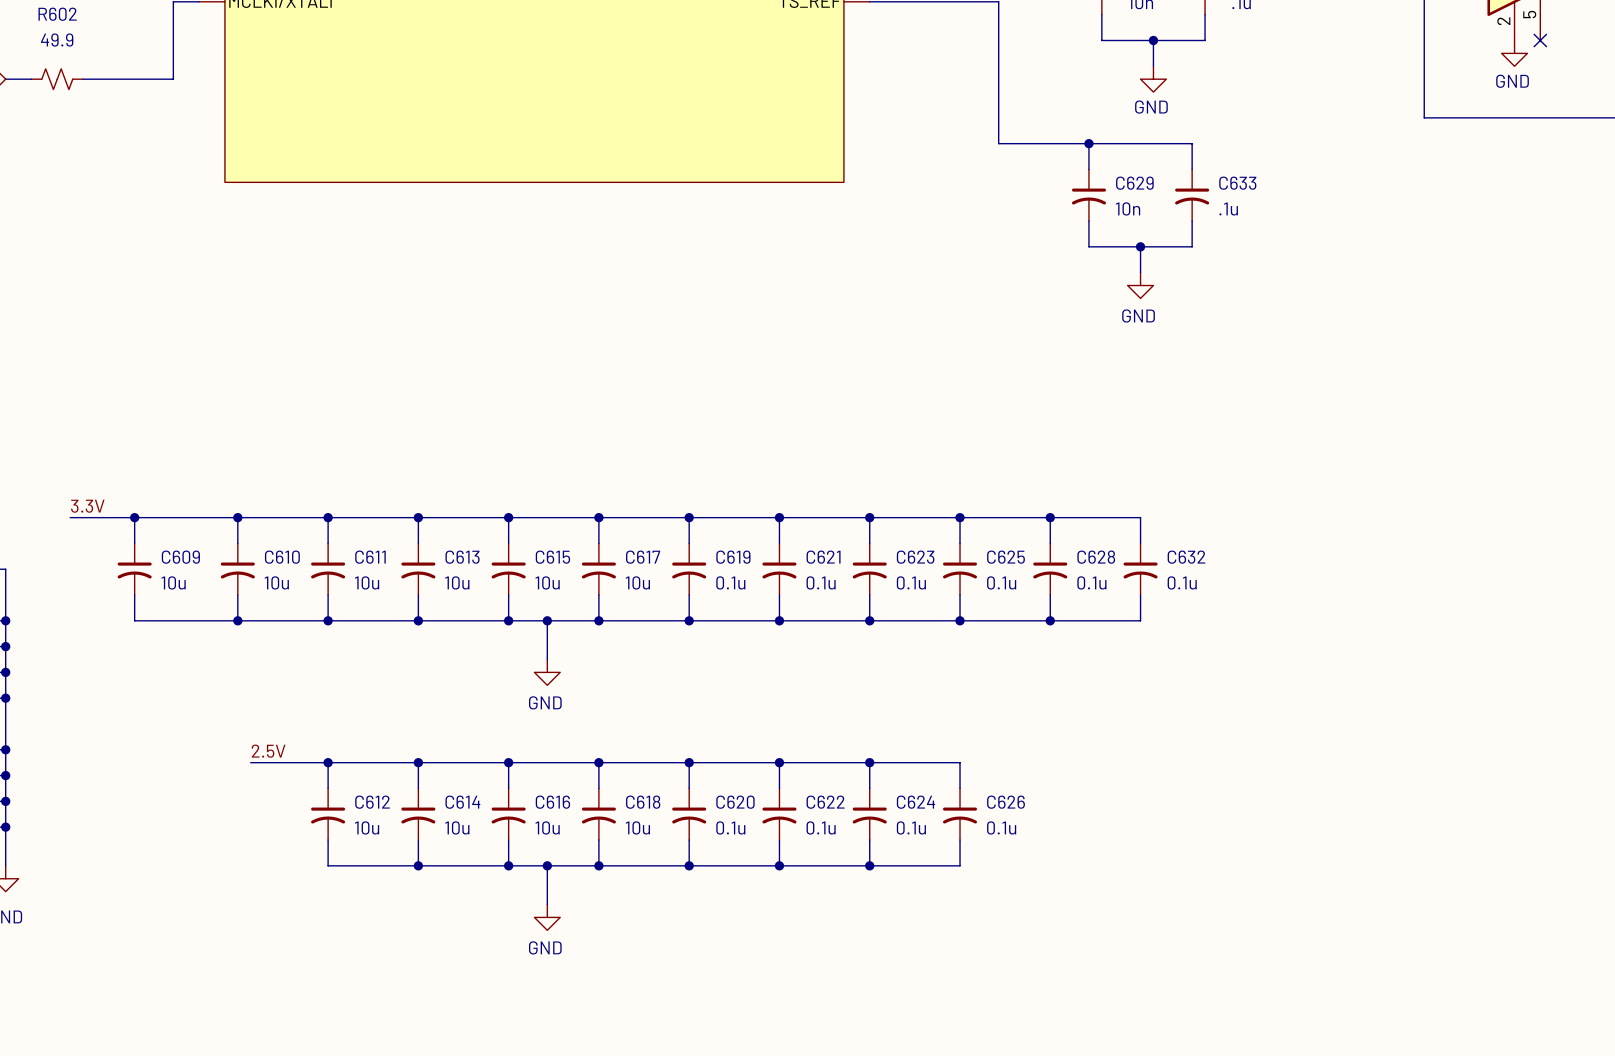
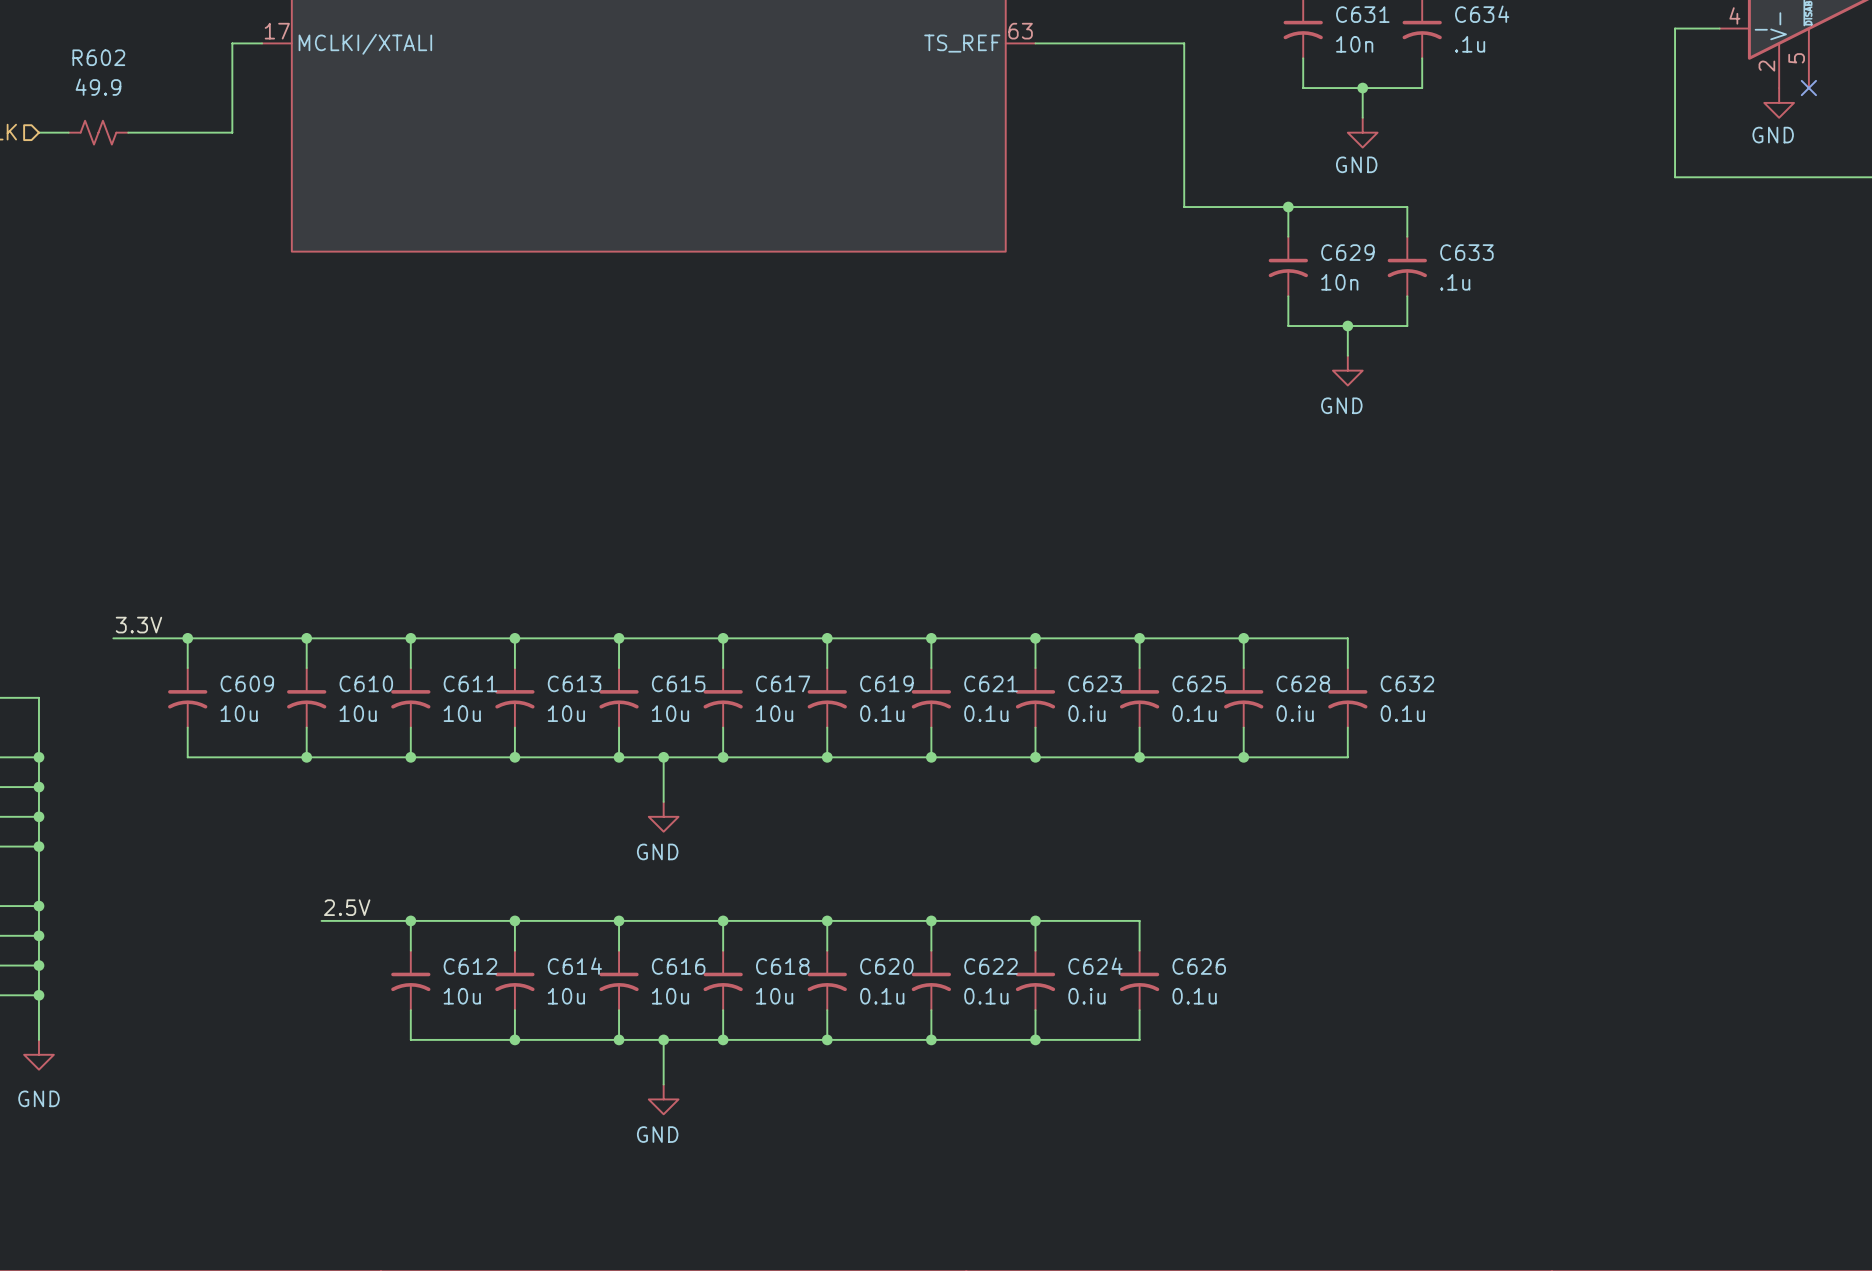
C623 value: 0.1u (911, 582) -> 0.iu (1086, 713)
C628 value: 0.1u (1091, 582) -> 0.iu (1295, 713)
C624 value: 0.1u (911, 827) -> 0.iu (1086, 996)

